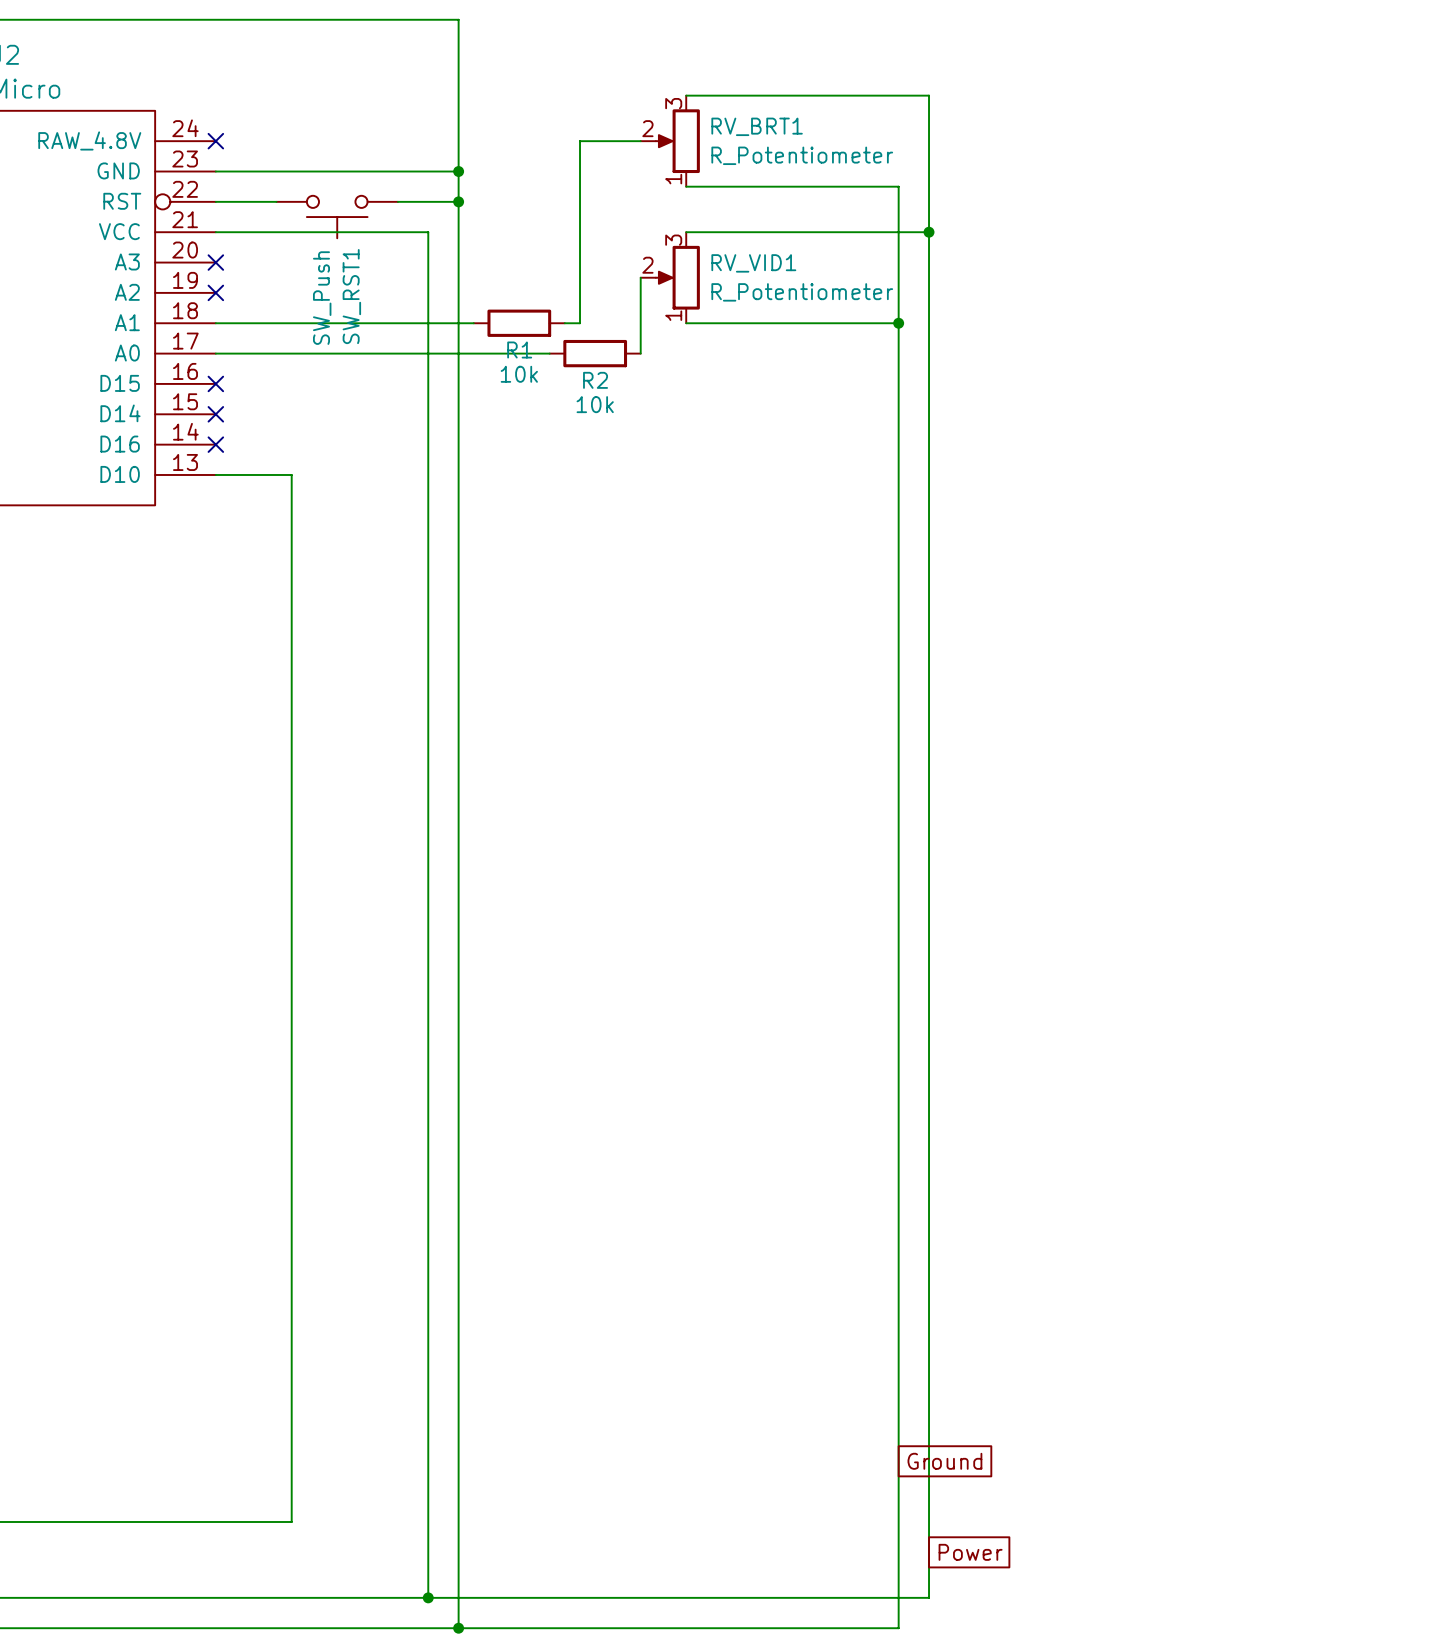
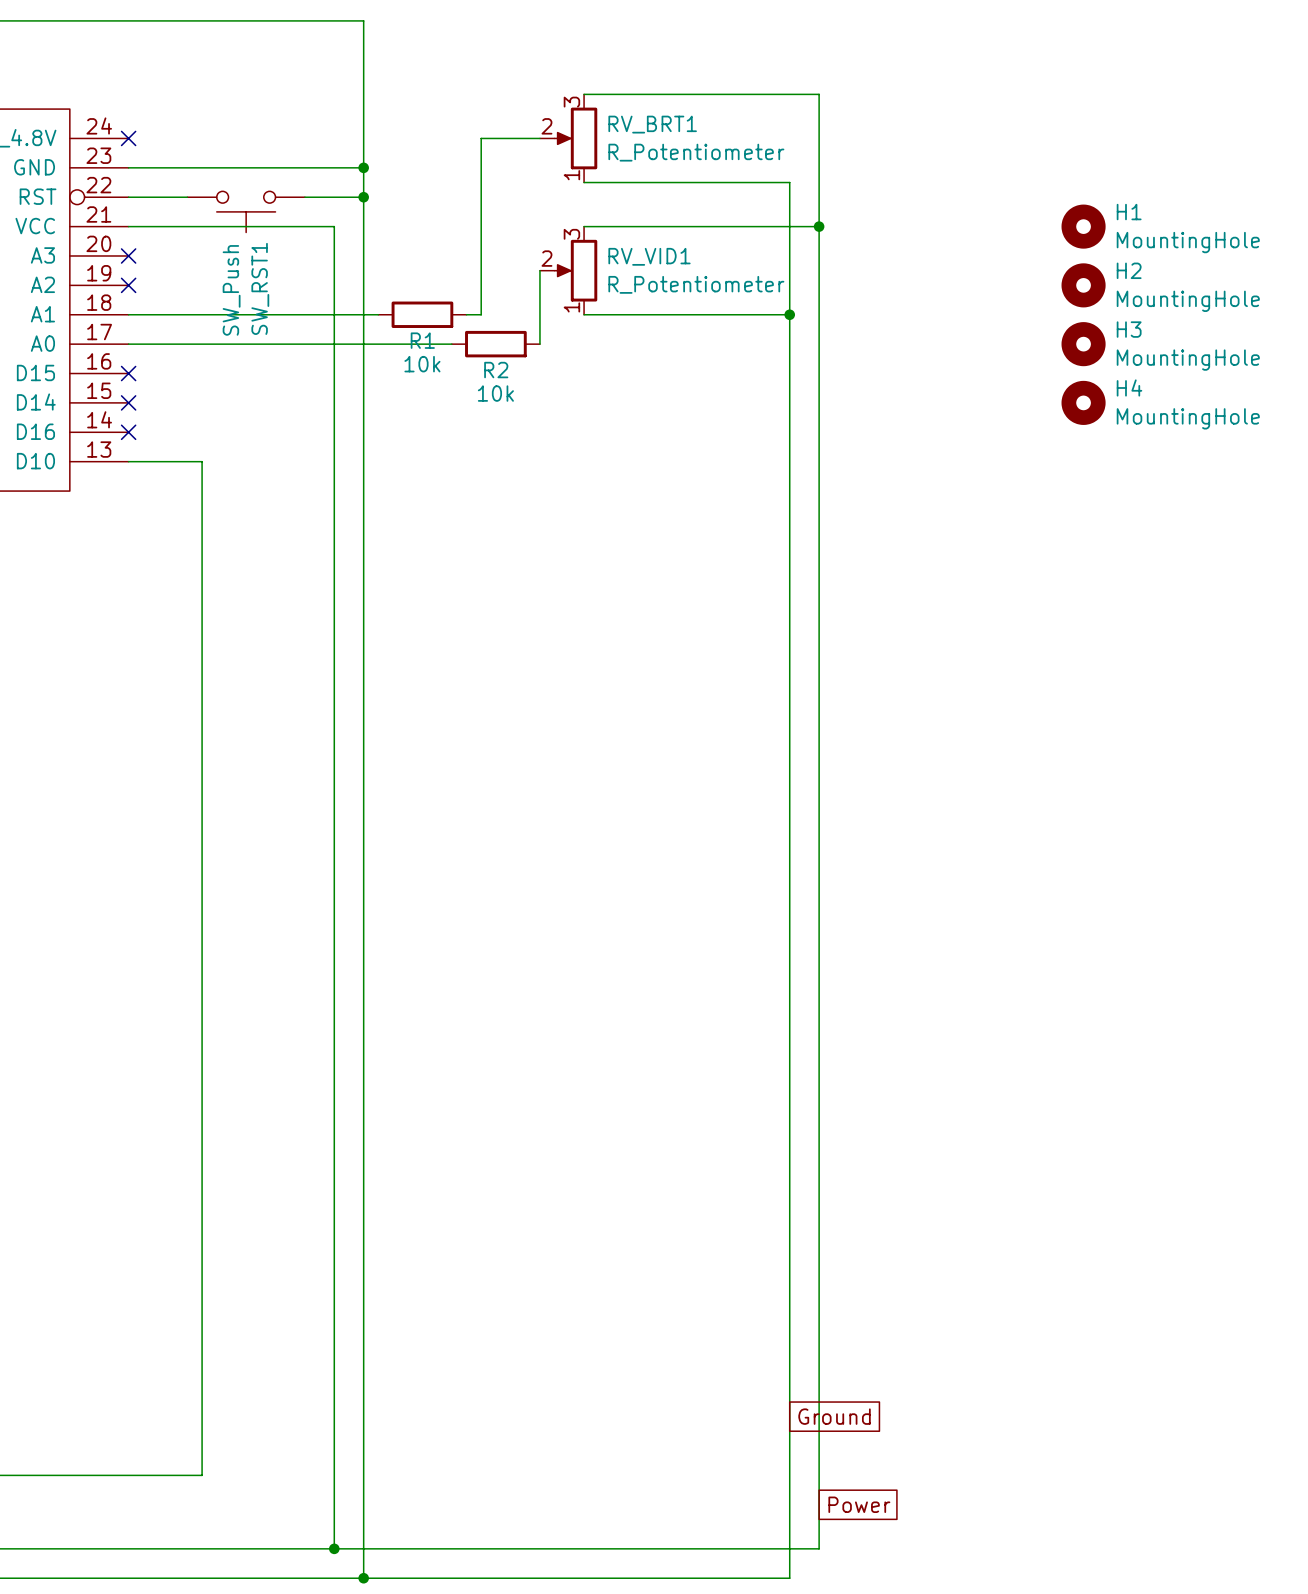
H1: none -> MountingHole (1083, 226)
H2: none -> MountingHole (1083, 285)
H3: none -> MountingHole (1083, 344)
H4: none -> MountingHole (1083, 402)

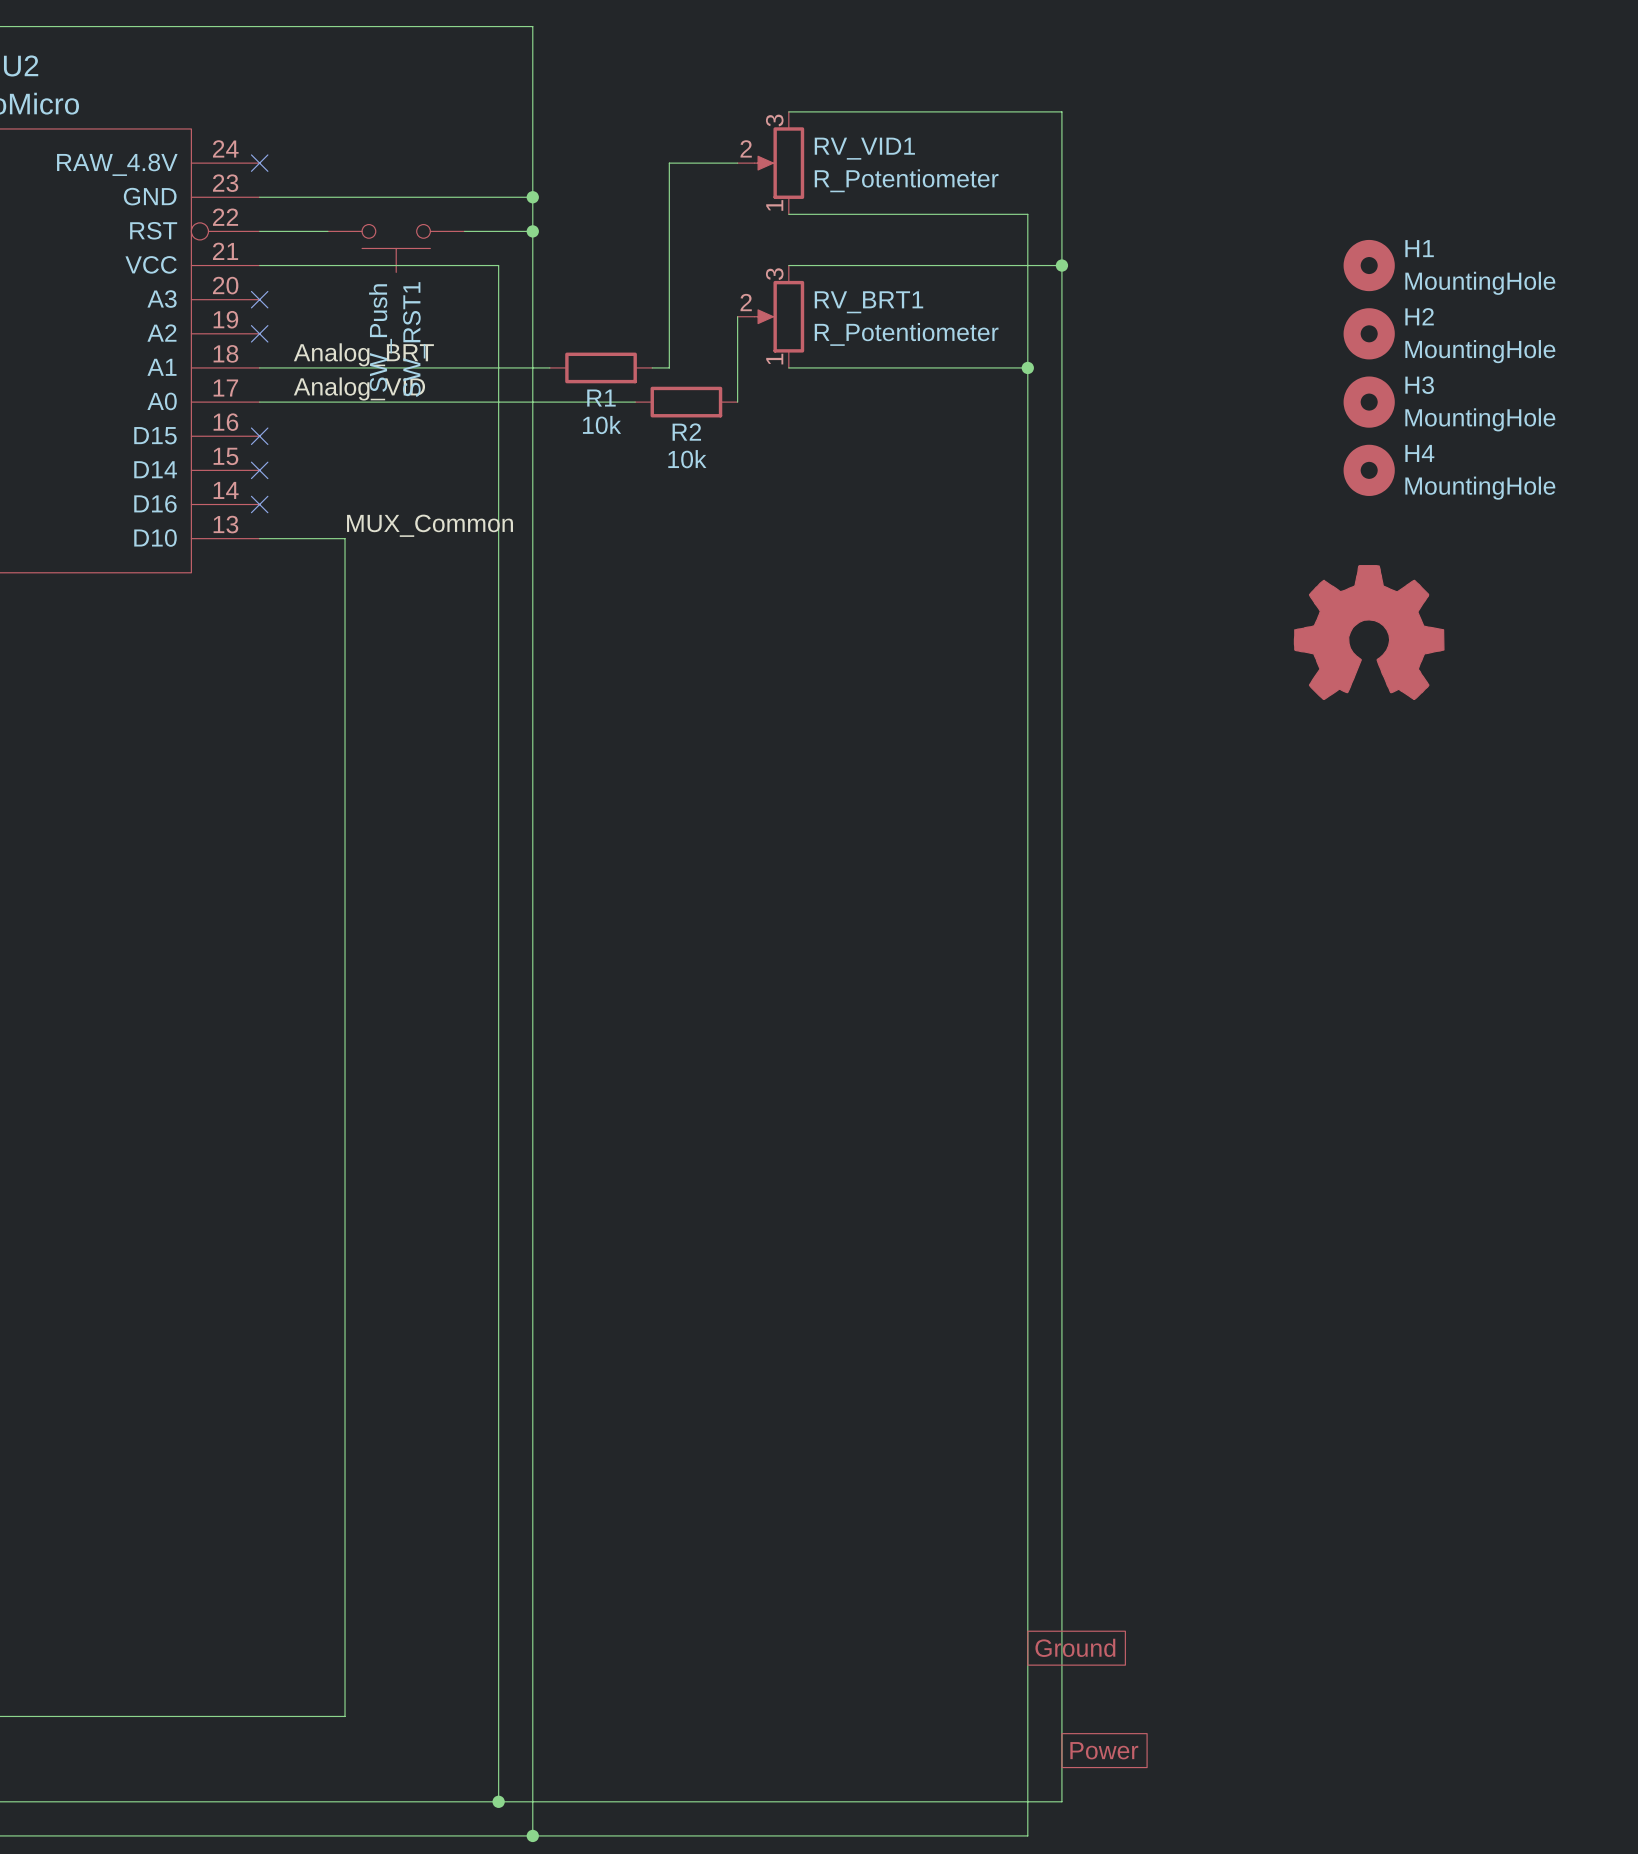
RV_BRT1 name: RV_BRT1 (652, 124) -> RV_VID1 (864, 148)
RV_VID1 name: RV_VID1 (649, 256) -> RV_BRT1 (868, 302)
label: none -> Analog_BRT (363, 354)
label: none -> Analog_VID (359, 388)
label: none -> MUX_Common (430, 525)
part: none -> (1369, 632)

